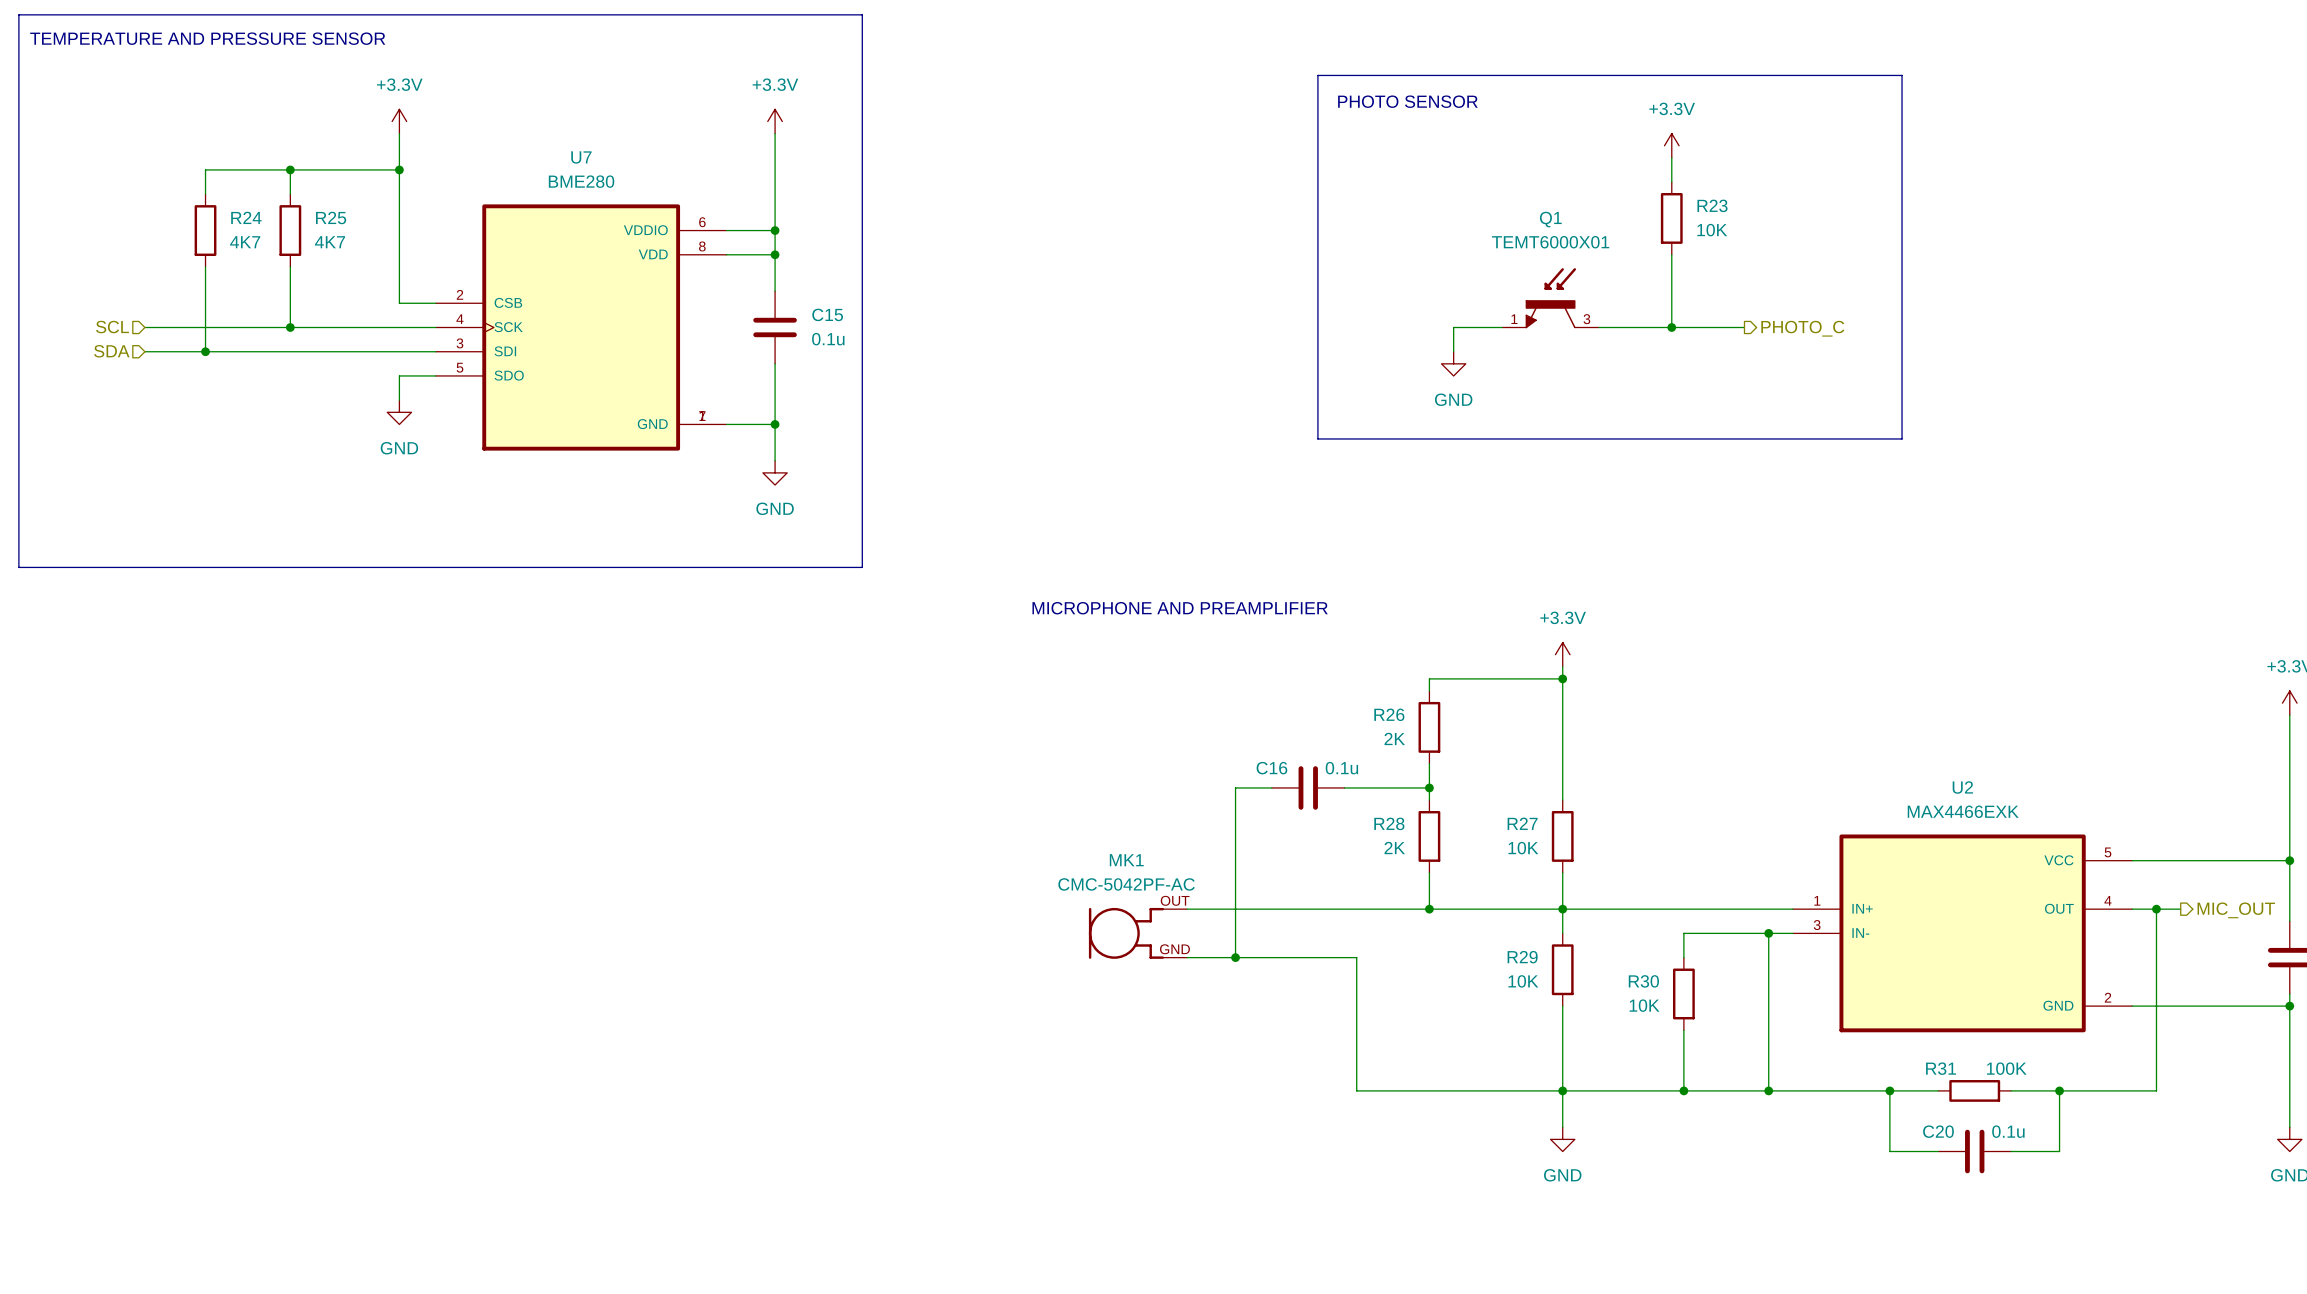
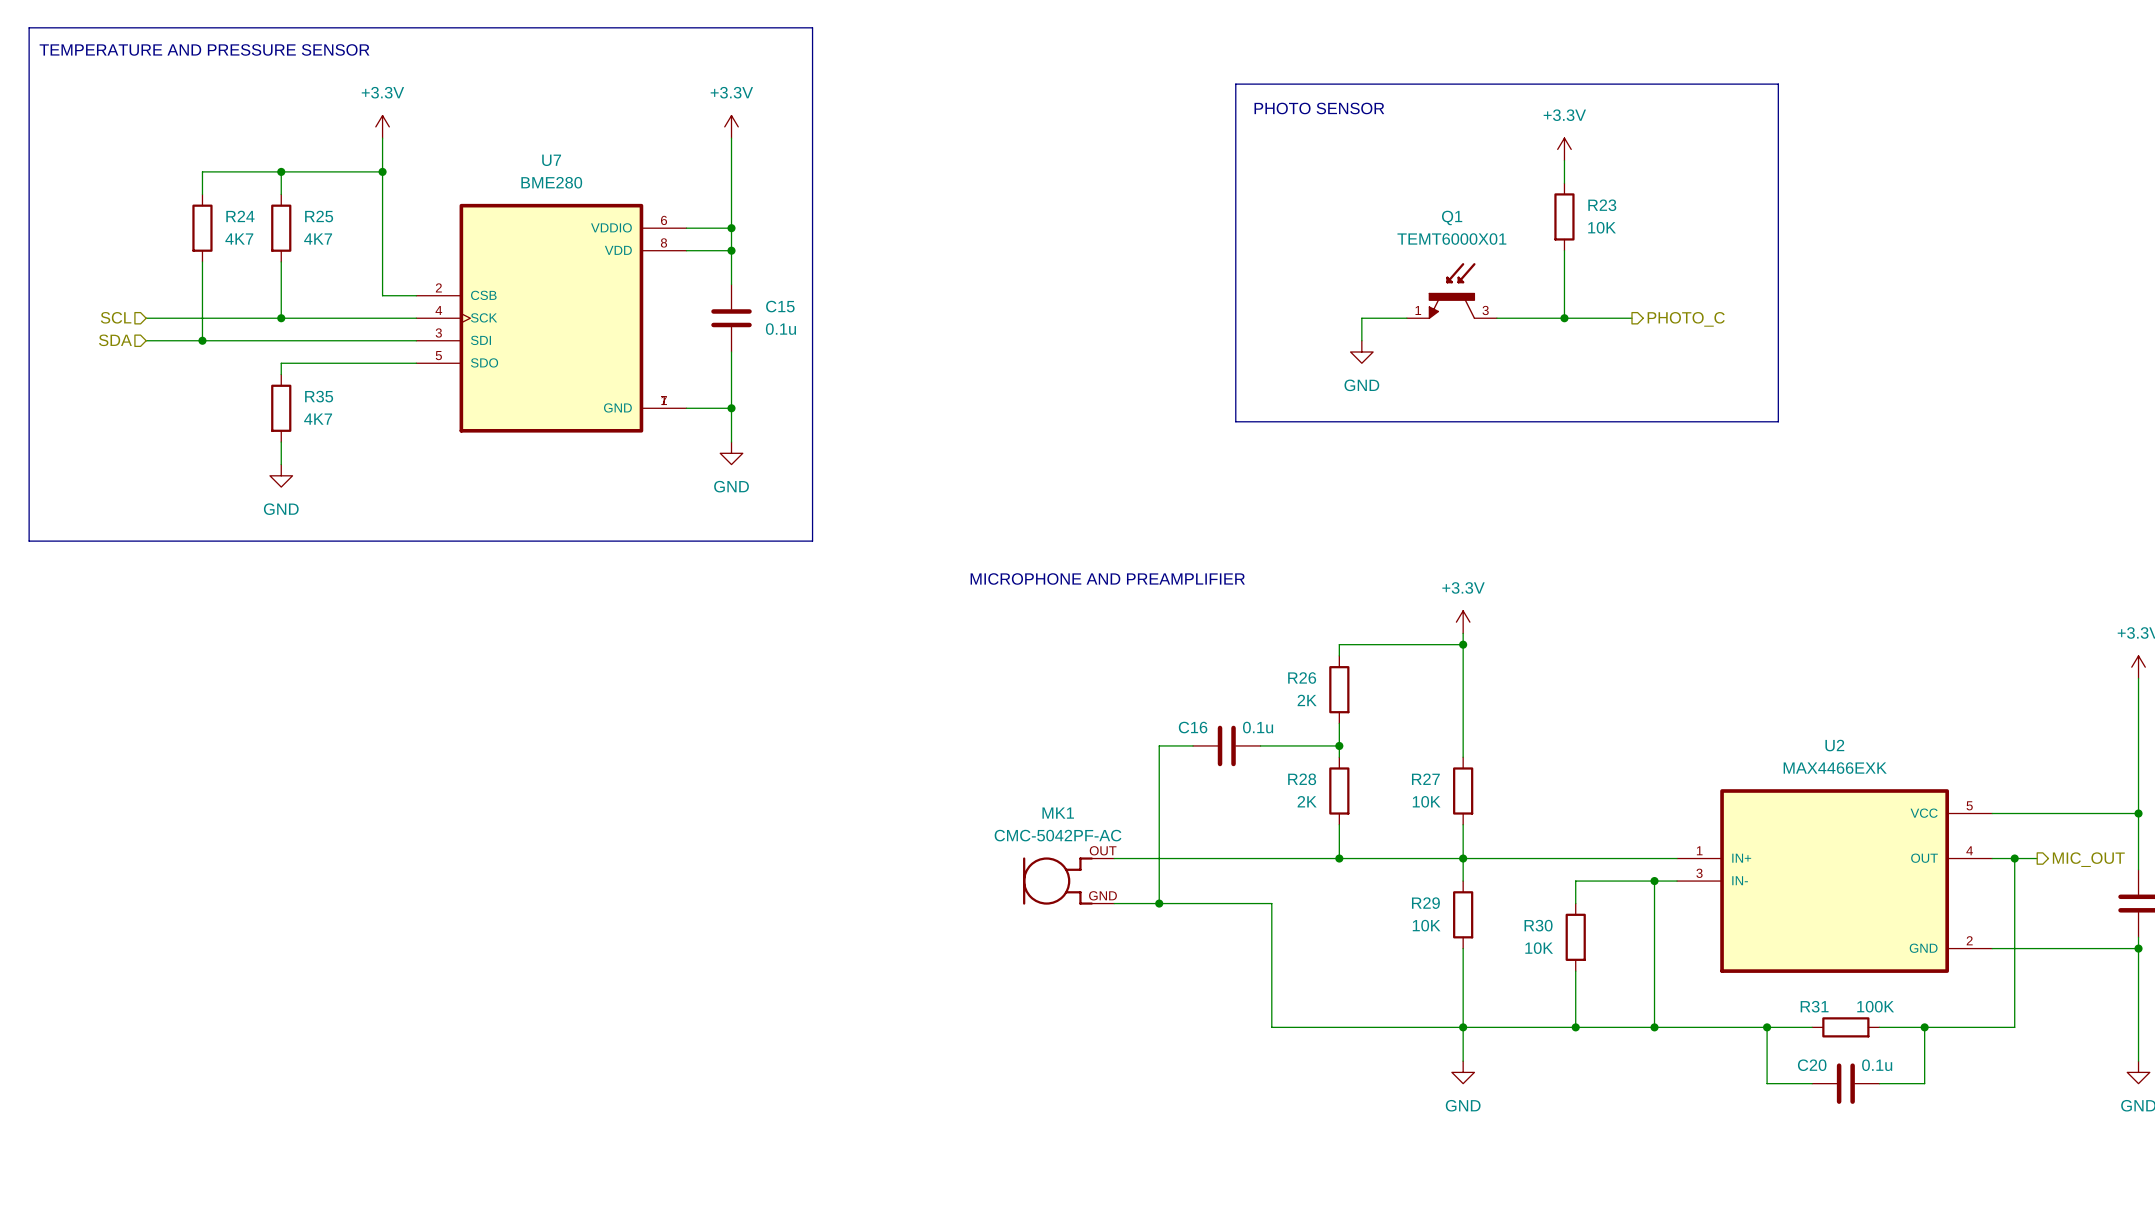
wire: (399, 375) (399, 400) -> (382, 363) (281, 363) (281, 374)
power symbol position: GND (399, 412) -> GND (281, 475)
R35: none -> 4K7 (281, 408)
wire: none -> (281, 442) (281, 464)

